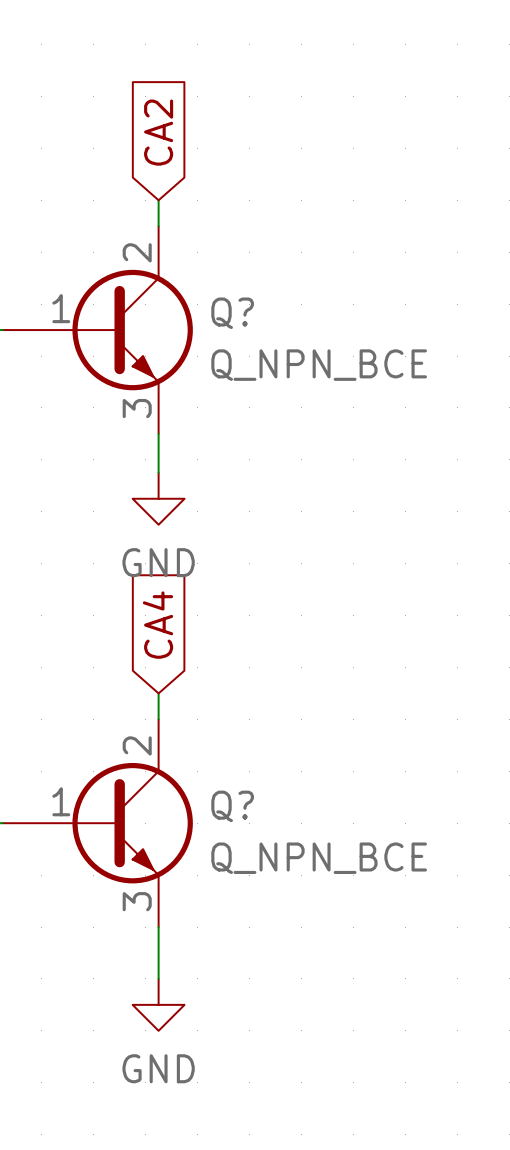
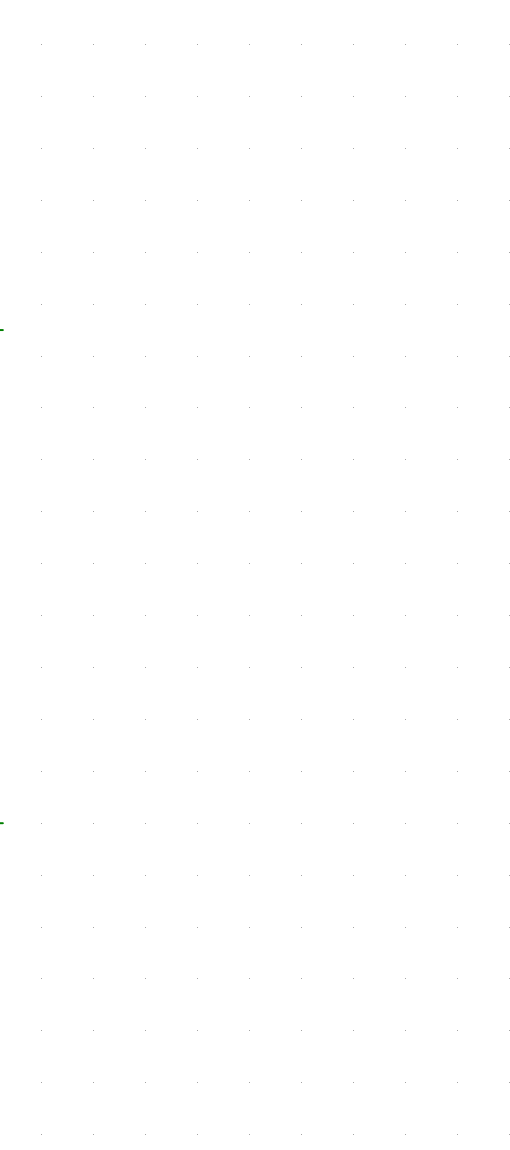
global label: CA2 (158, 132) -> none
wire: (158, 200) (158, 226) -> none
Q?: Q_NPN_BCE (97, 330) -> none
wire: (158, 433) (158, 472) -> none
power symbol: GND (158, 498) -> none
global label: CA4 (157, 625) -> none
wire: (158, 693) (158, 719) -> none
Q?: Q_NPN_BCE (97, 823) -> none
wire: (158, 927) (158, 978) -> none
power symbol: GND (158, 1004) -> none

